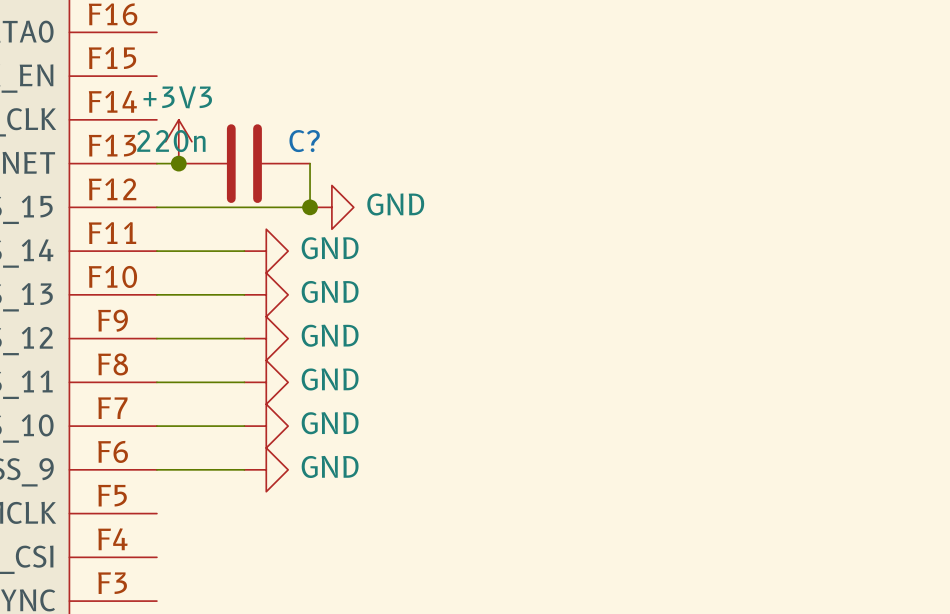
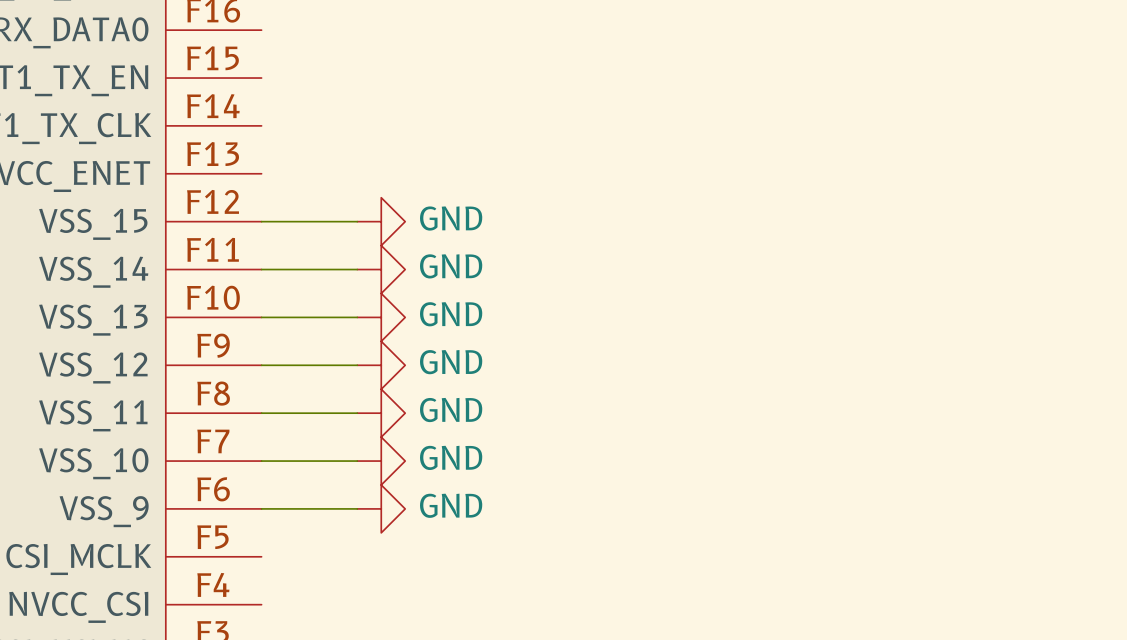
power symbol: +3V3 (178, 141) -> none
wire: (156, 163) (178, 163) -> none
junction: (178, 163) -> none
C?: 220n (244, 163) -> none
wire: (310, 163) (310, 207) (244, 207) -> none
junction: (310, 207) -> none
power symbol position: GND (331, 207) -> GND (381, 221)

